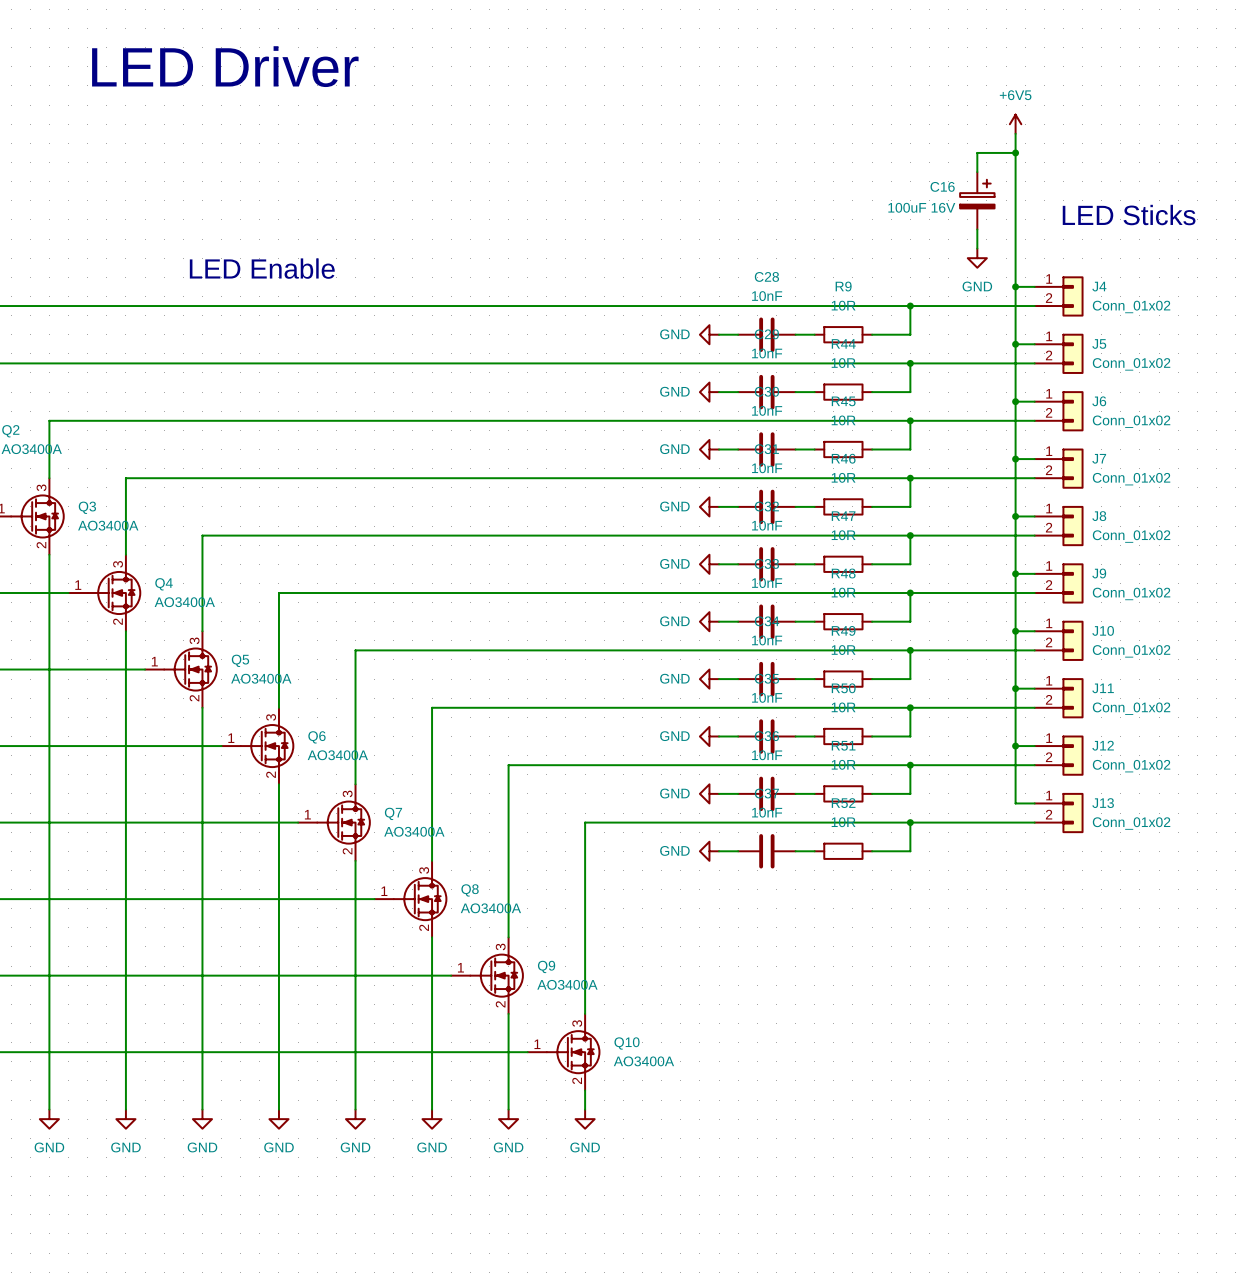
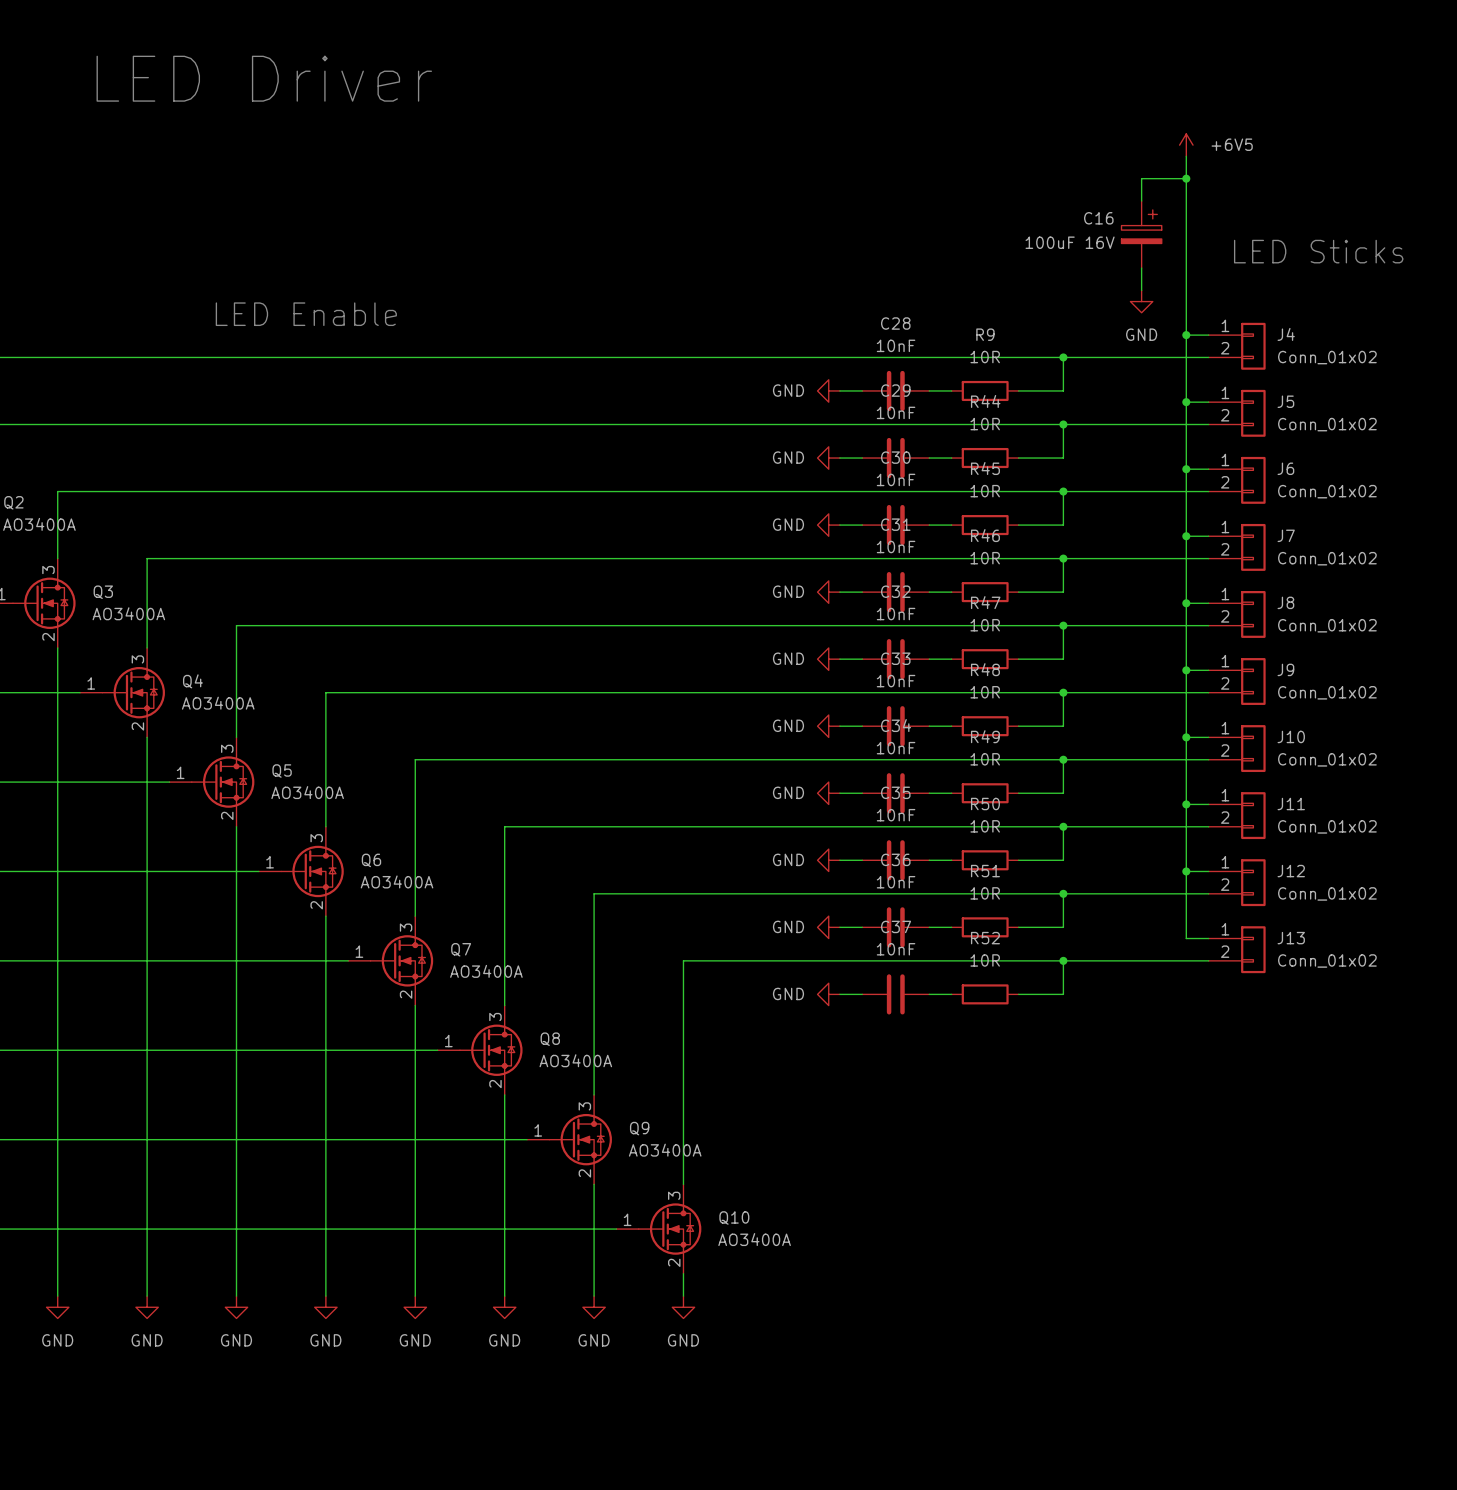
power symbol text position: +6V5 (1015, 95) -> +6V5 (1232, 144)

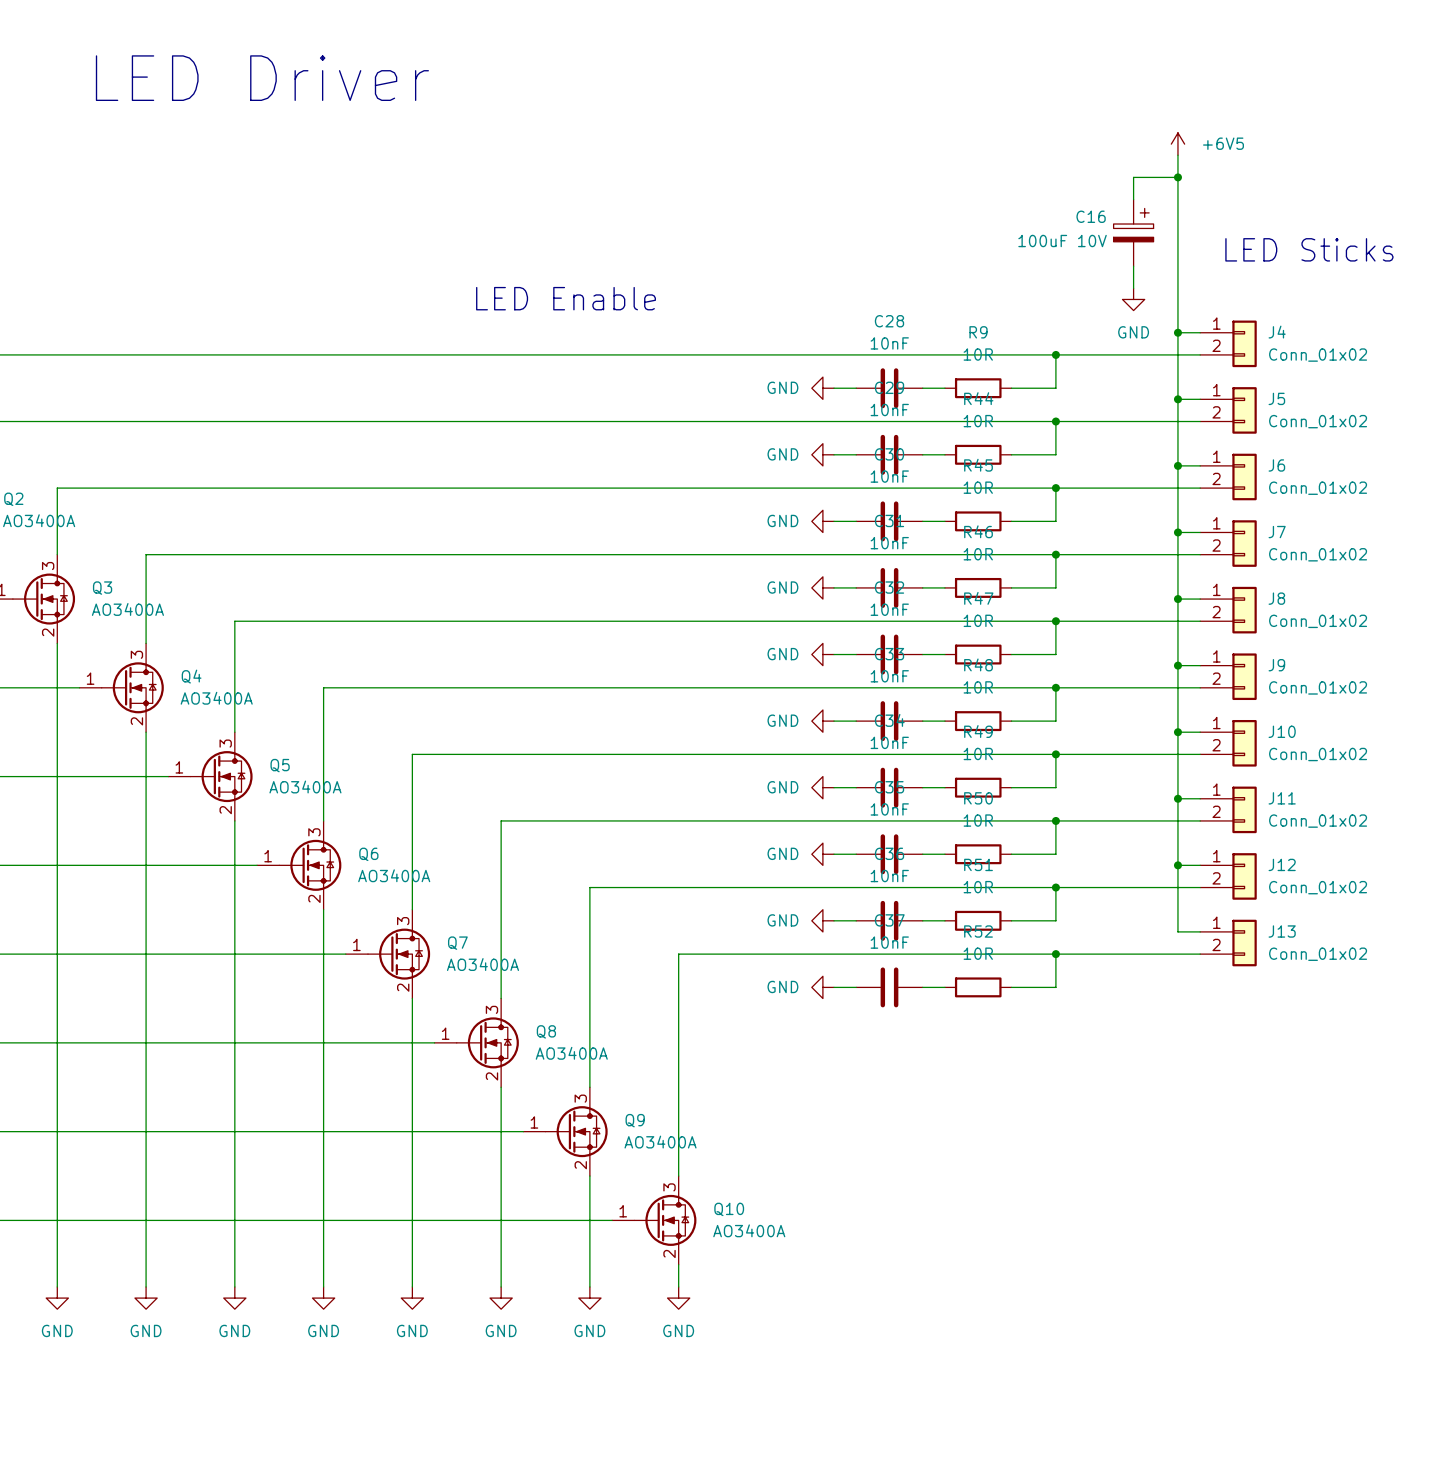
C16 value: 100uF 16V (1070, 242) -> 100uF 10V (1062, 241)
text: none -> LED Enable (566, 298)
text: LED Enable (306, 314) -> none

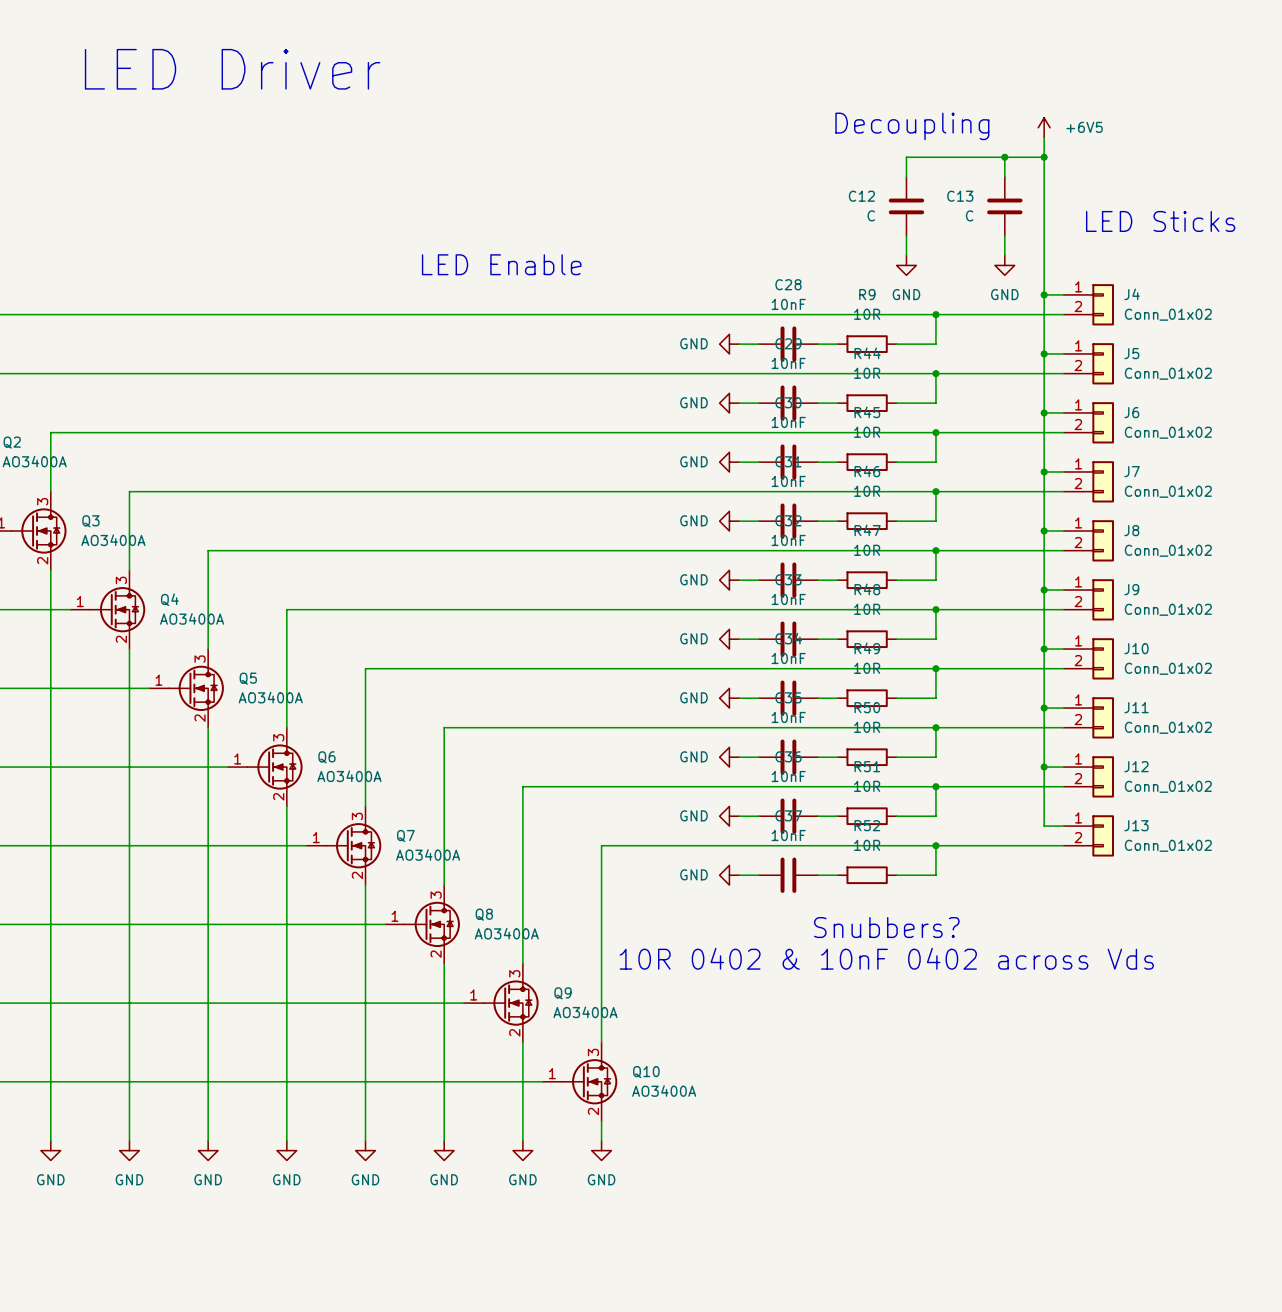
text: none -> Decoupling (912, 126)
wire: none -> (1004, 157) (906, 157) (906, 176)
junction: none -> (1004, 157)
C12: none -> C (906, 206)
C16: 100uF 10V (1133, 232) -> none
C13: none -> C (1004, 206)
wire: none -> (906, 235) (906, 255)
power symbol: none -> GND (906, 265)
text: none -> Snubbers? (886, 927)
text: none -> 10R 0402 & 10nF 0402 across Vds (886, 958)

